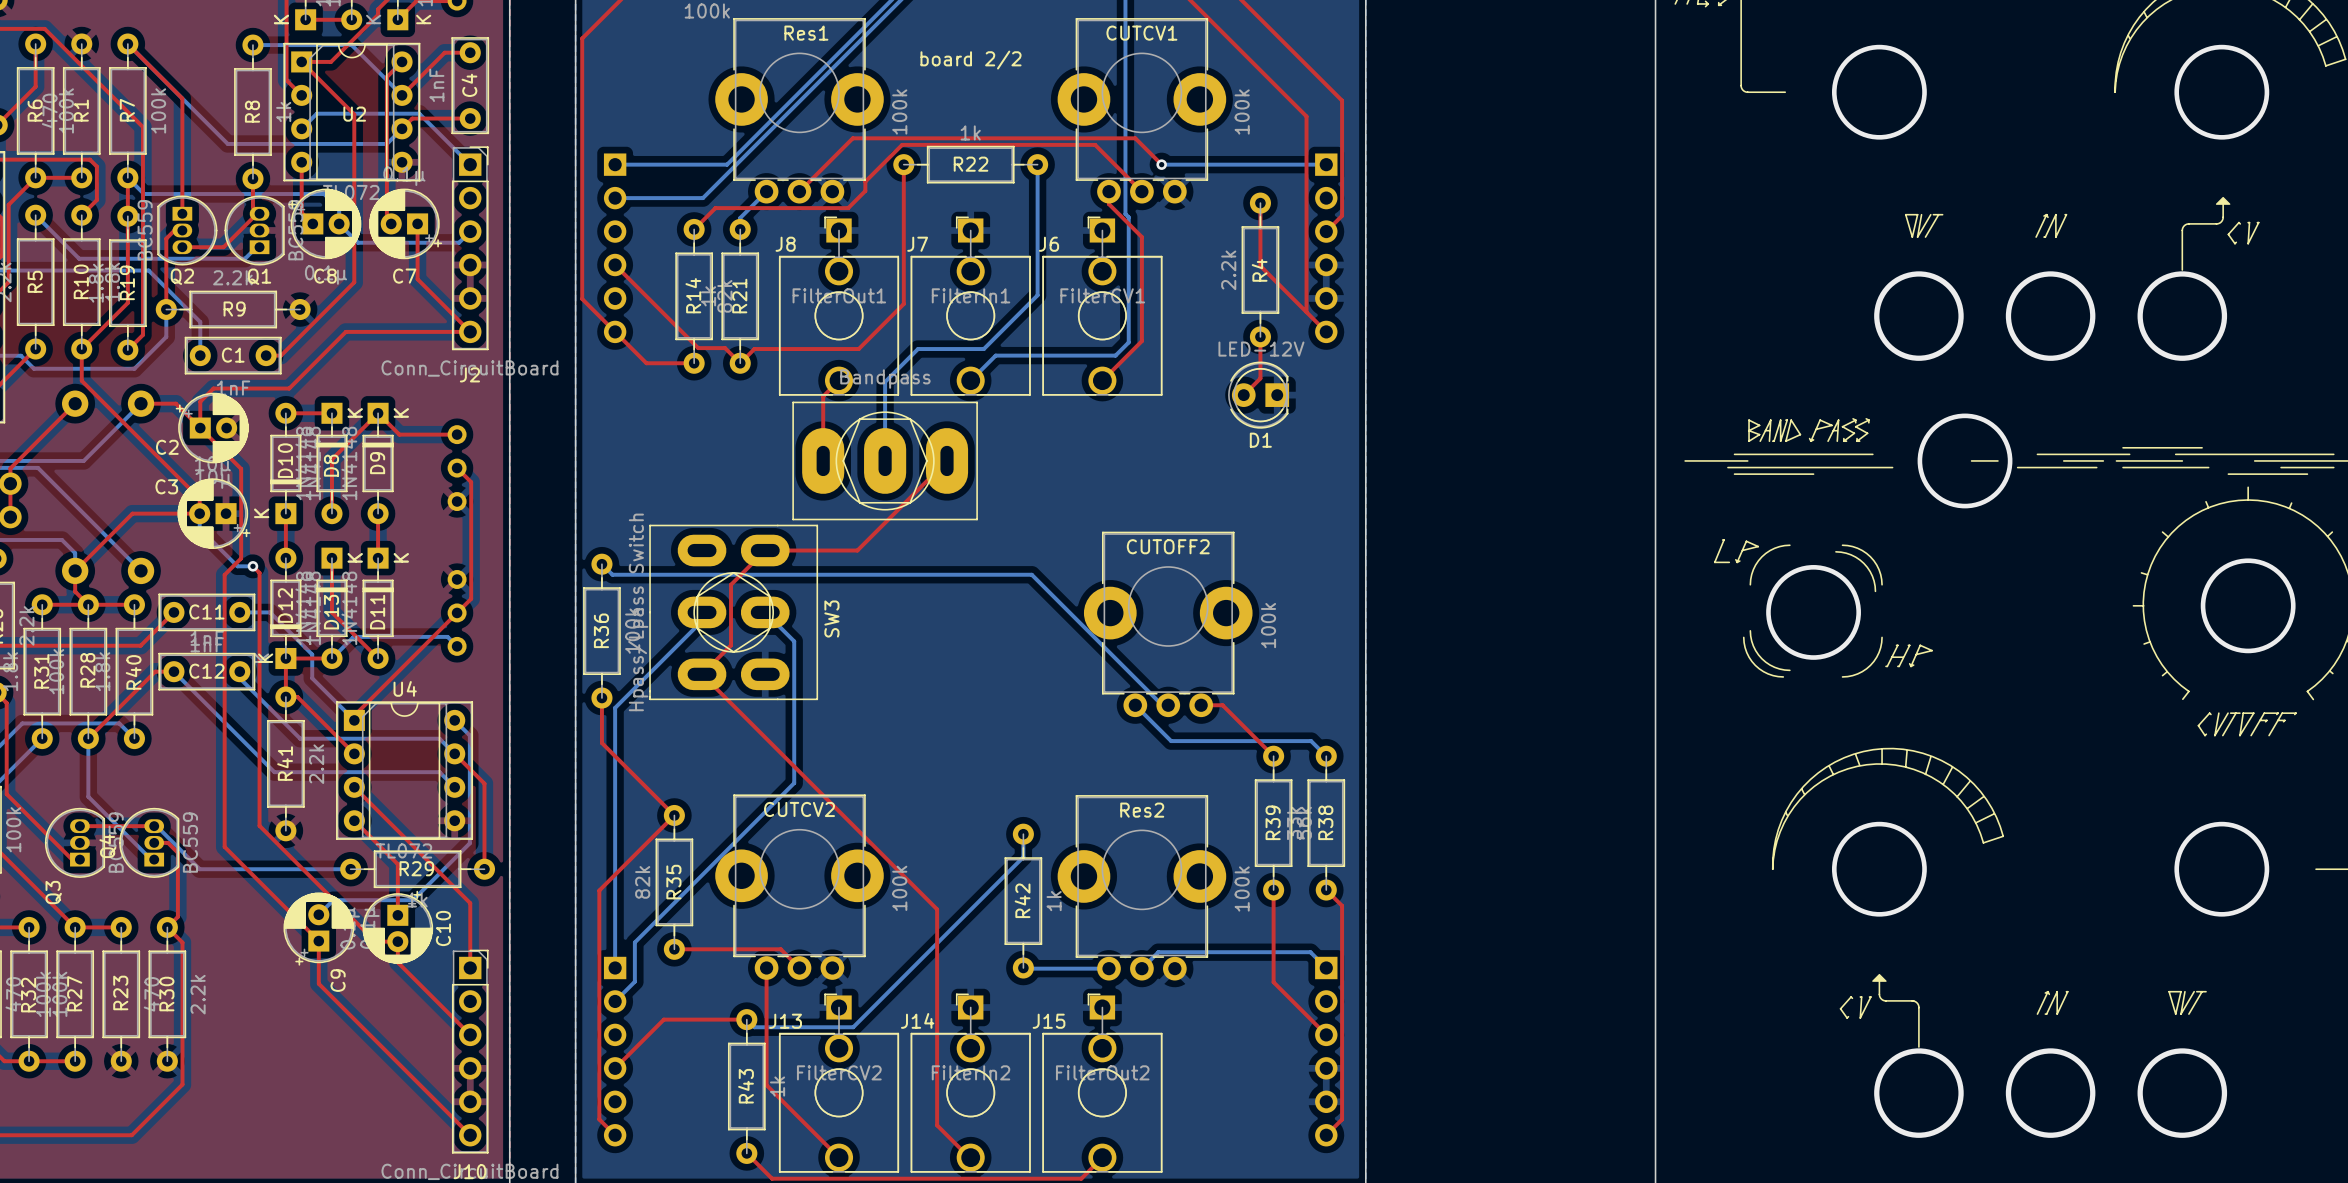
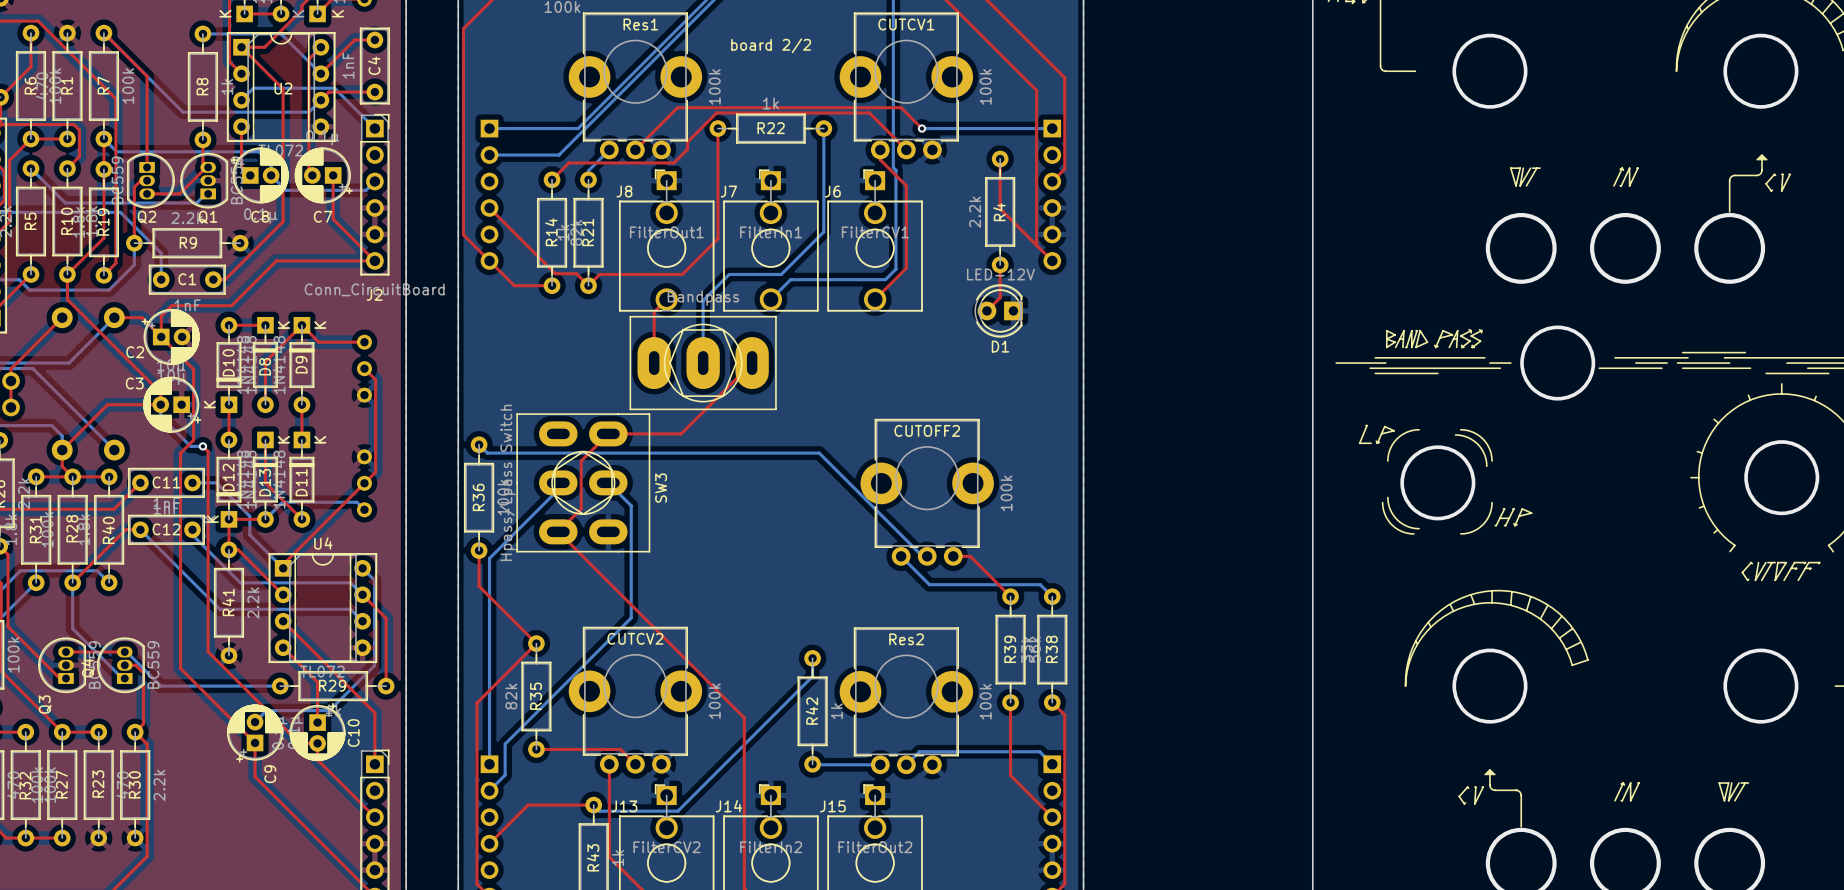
line: (1971, 460) (1997, 460) -> (1489, 363) (1510, 363)

